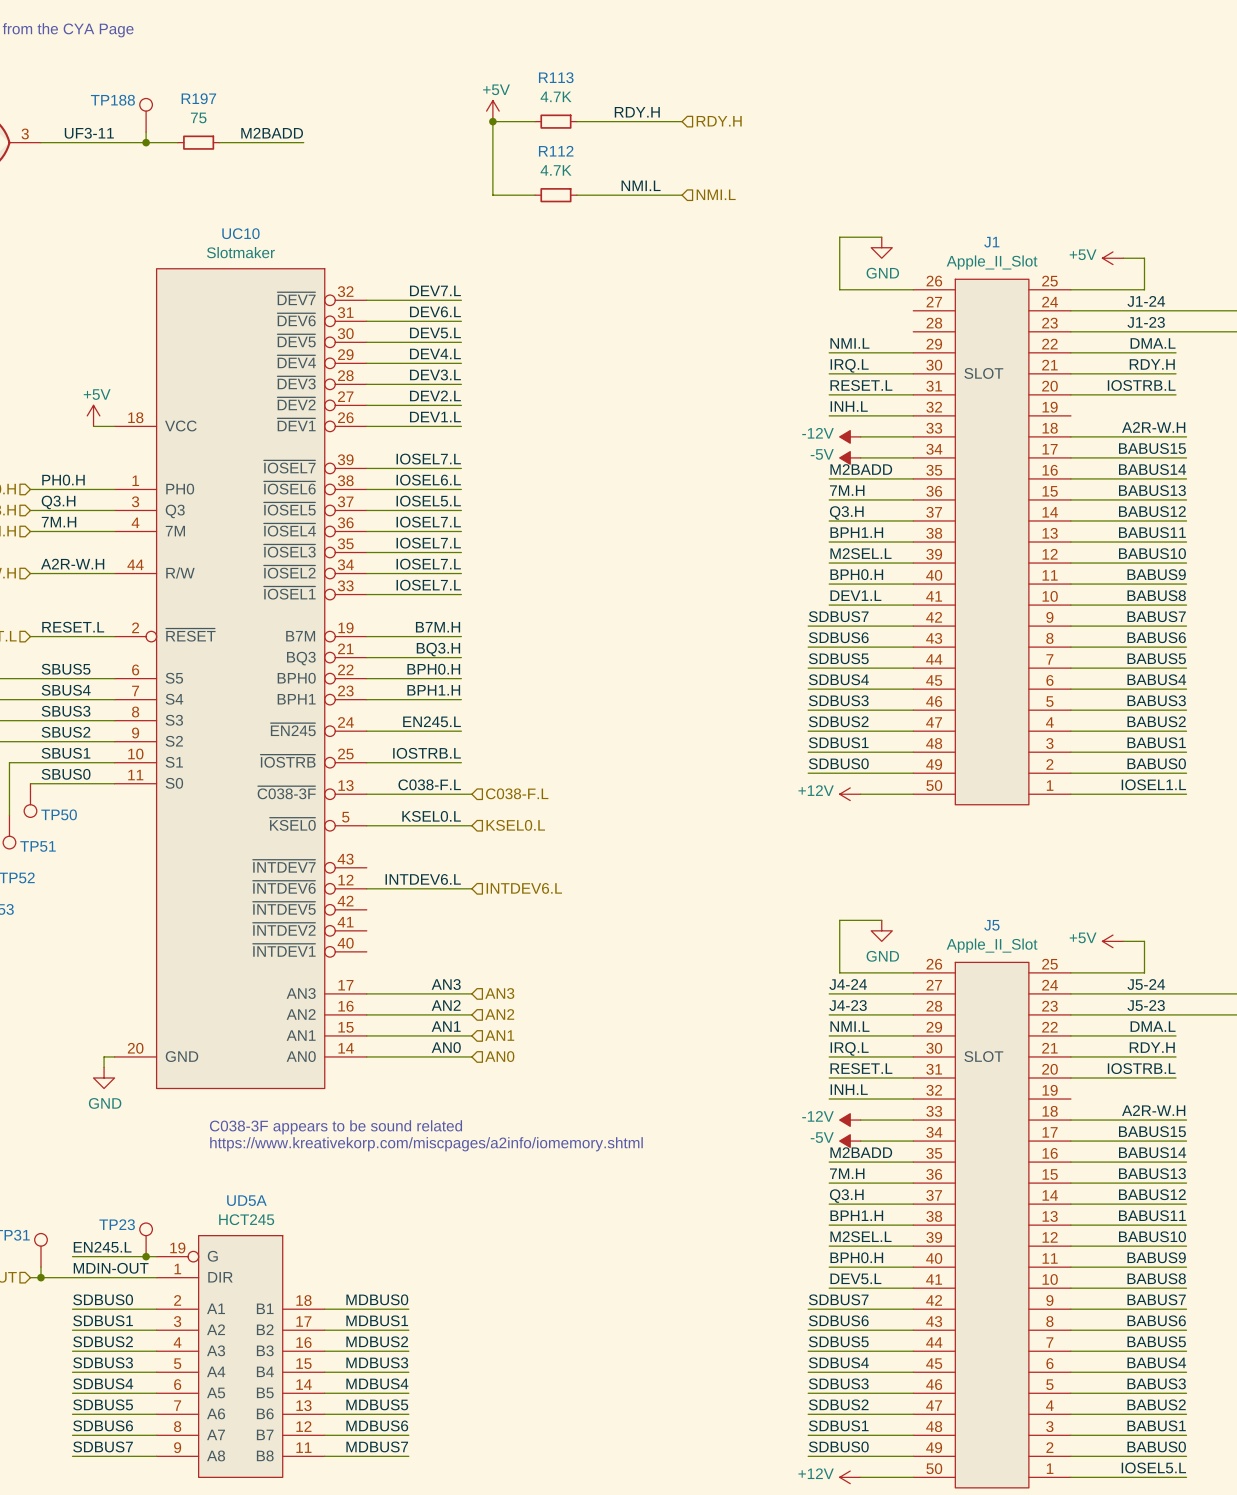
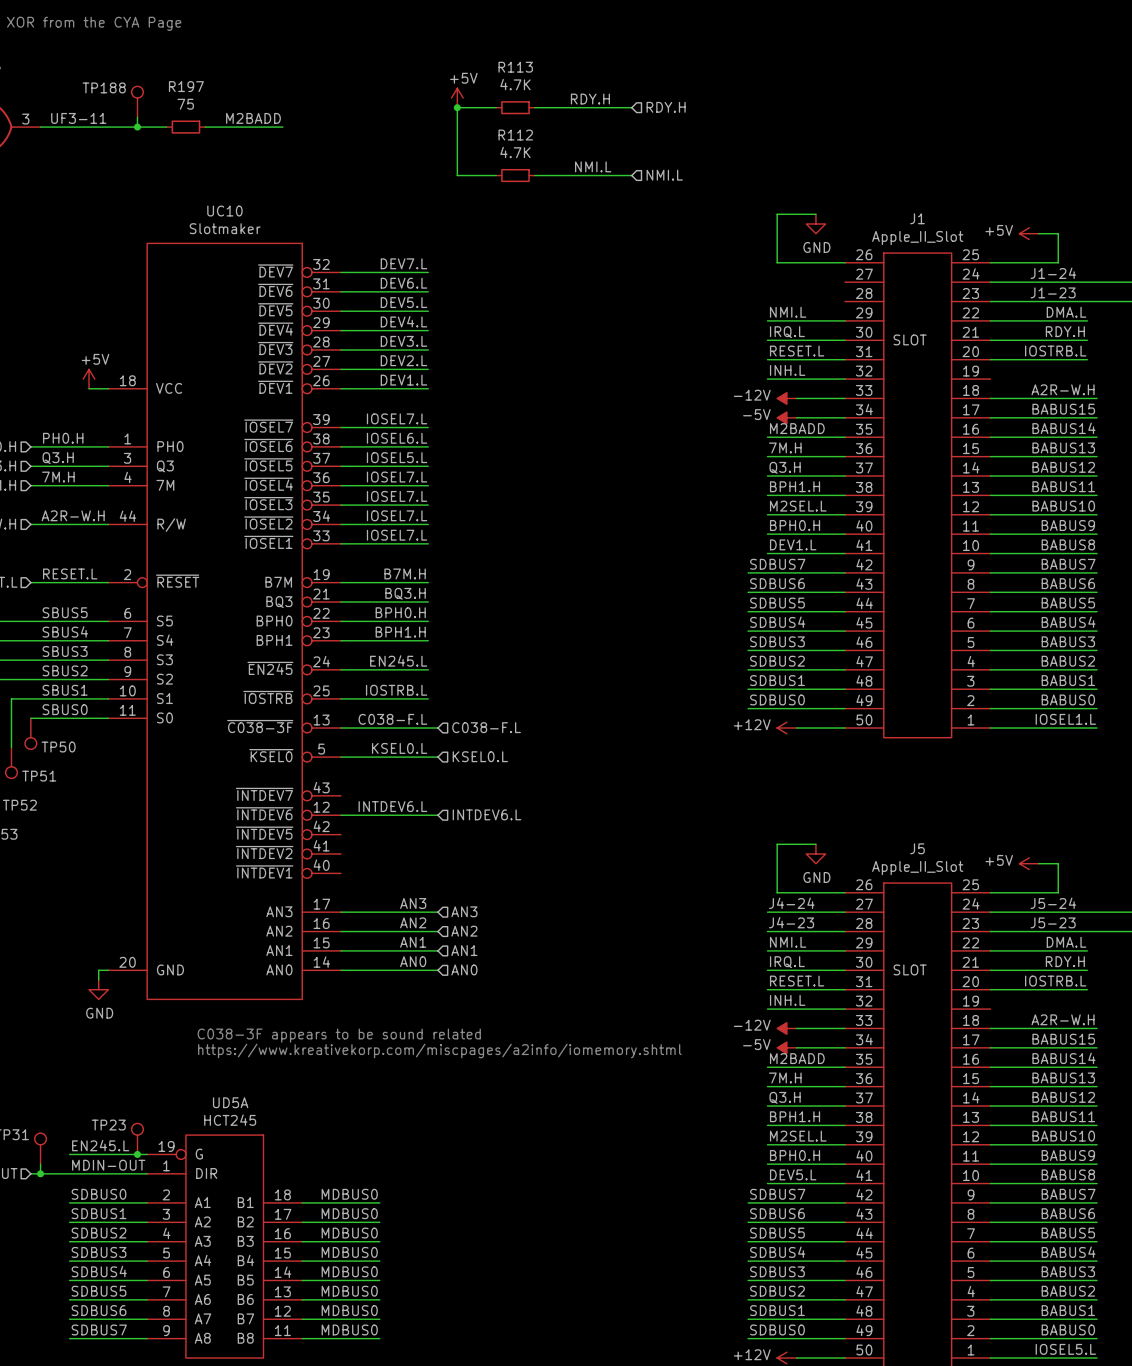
label: MDBUS1 (377, 1320) -> MDBUS0 (349, 1213)
label: MDBUS2 (377, 1341) -> MDBUS0 (349, 1233)
label: MDBUS3 (377, 1362) -> MDBUS0 (349, 1252)
label: MDBUS4 (377, 1383) -> MDBUS0 (349, 1271)
label: MDBUS5 (377, 1404) -> MDBUS0 (349, 1291)
label: MDBUS6 (377, 1425) -> MDBUS0 (349, 1310)
label: MDBUS7 (377, 1446) -> MDBUS0 (349, 1329)

